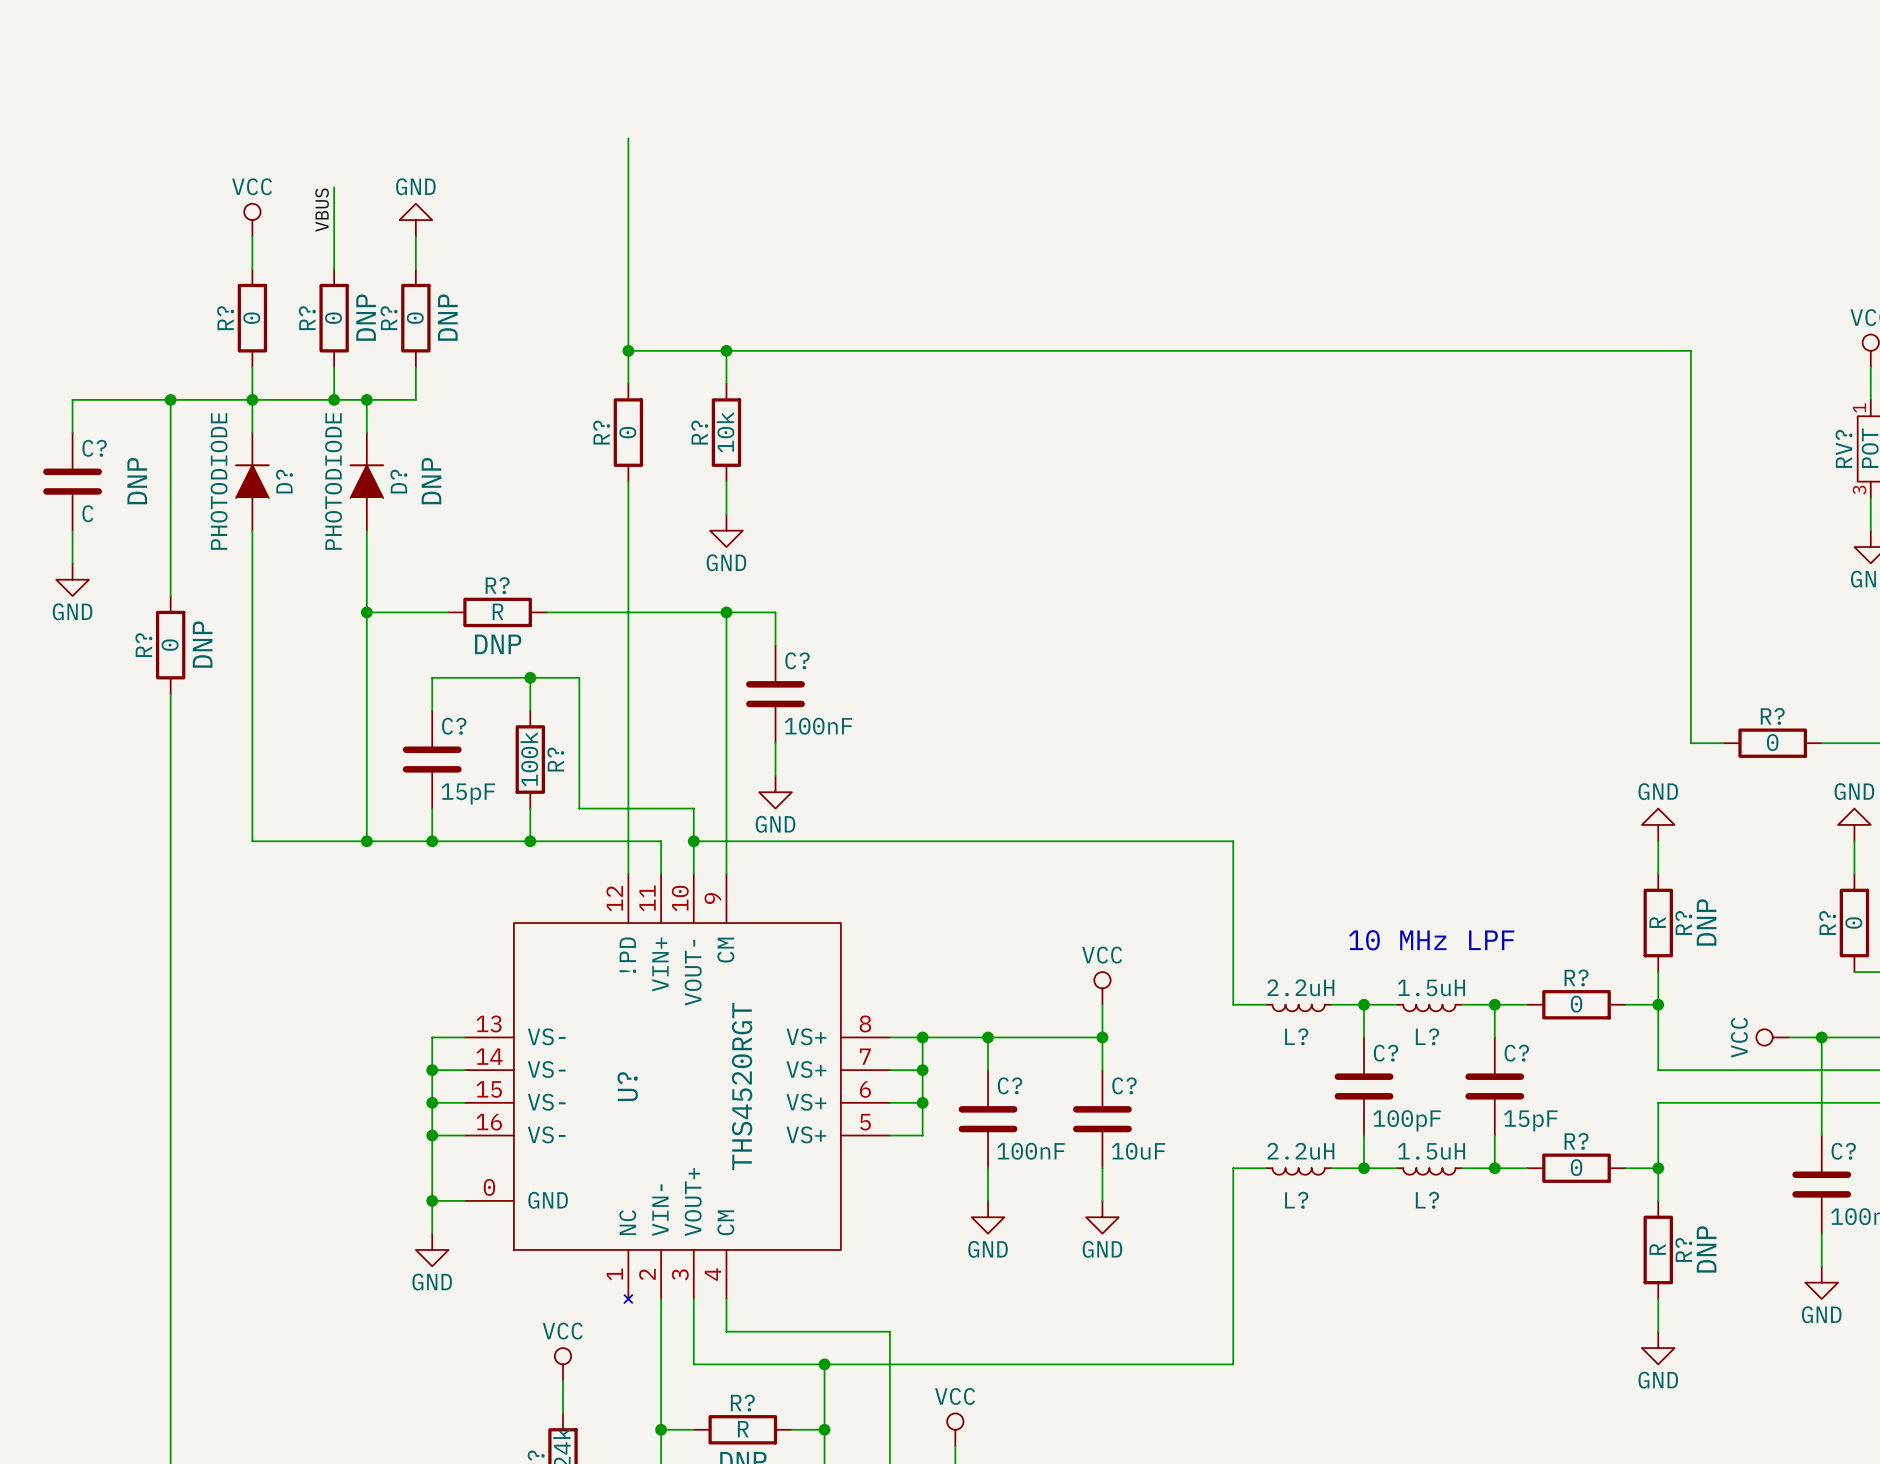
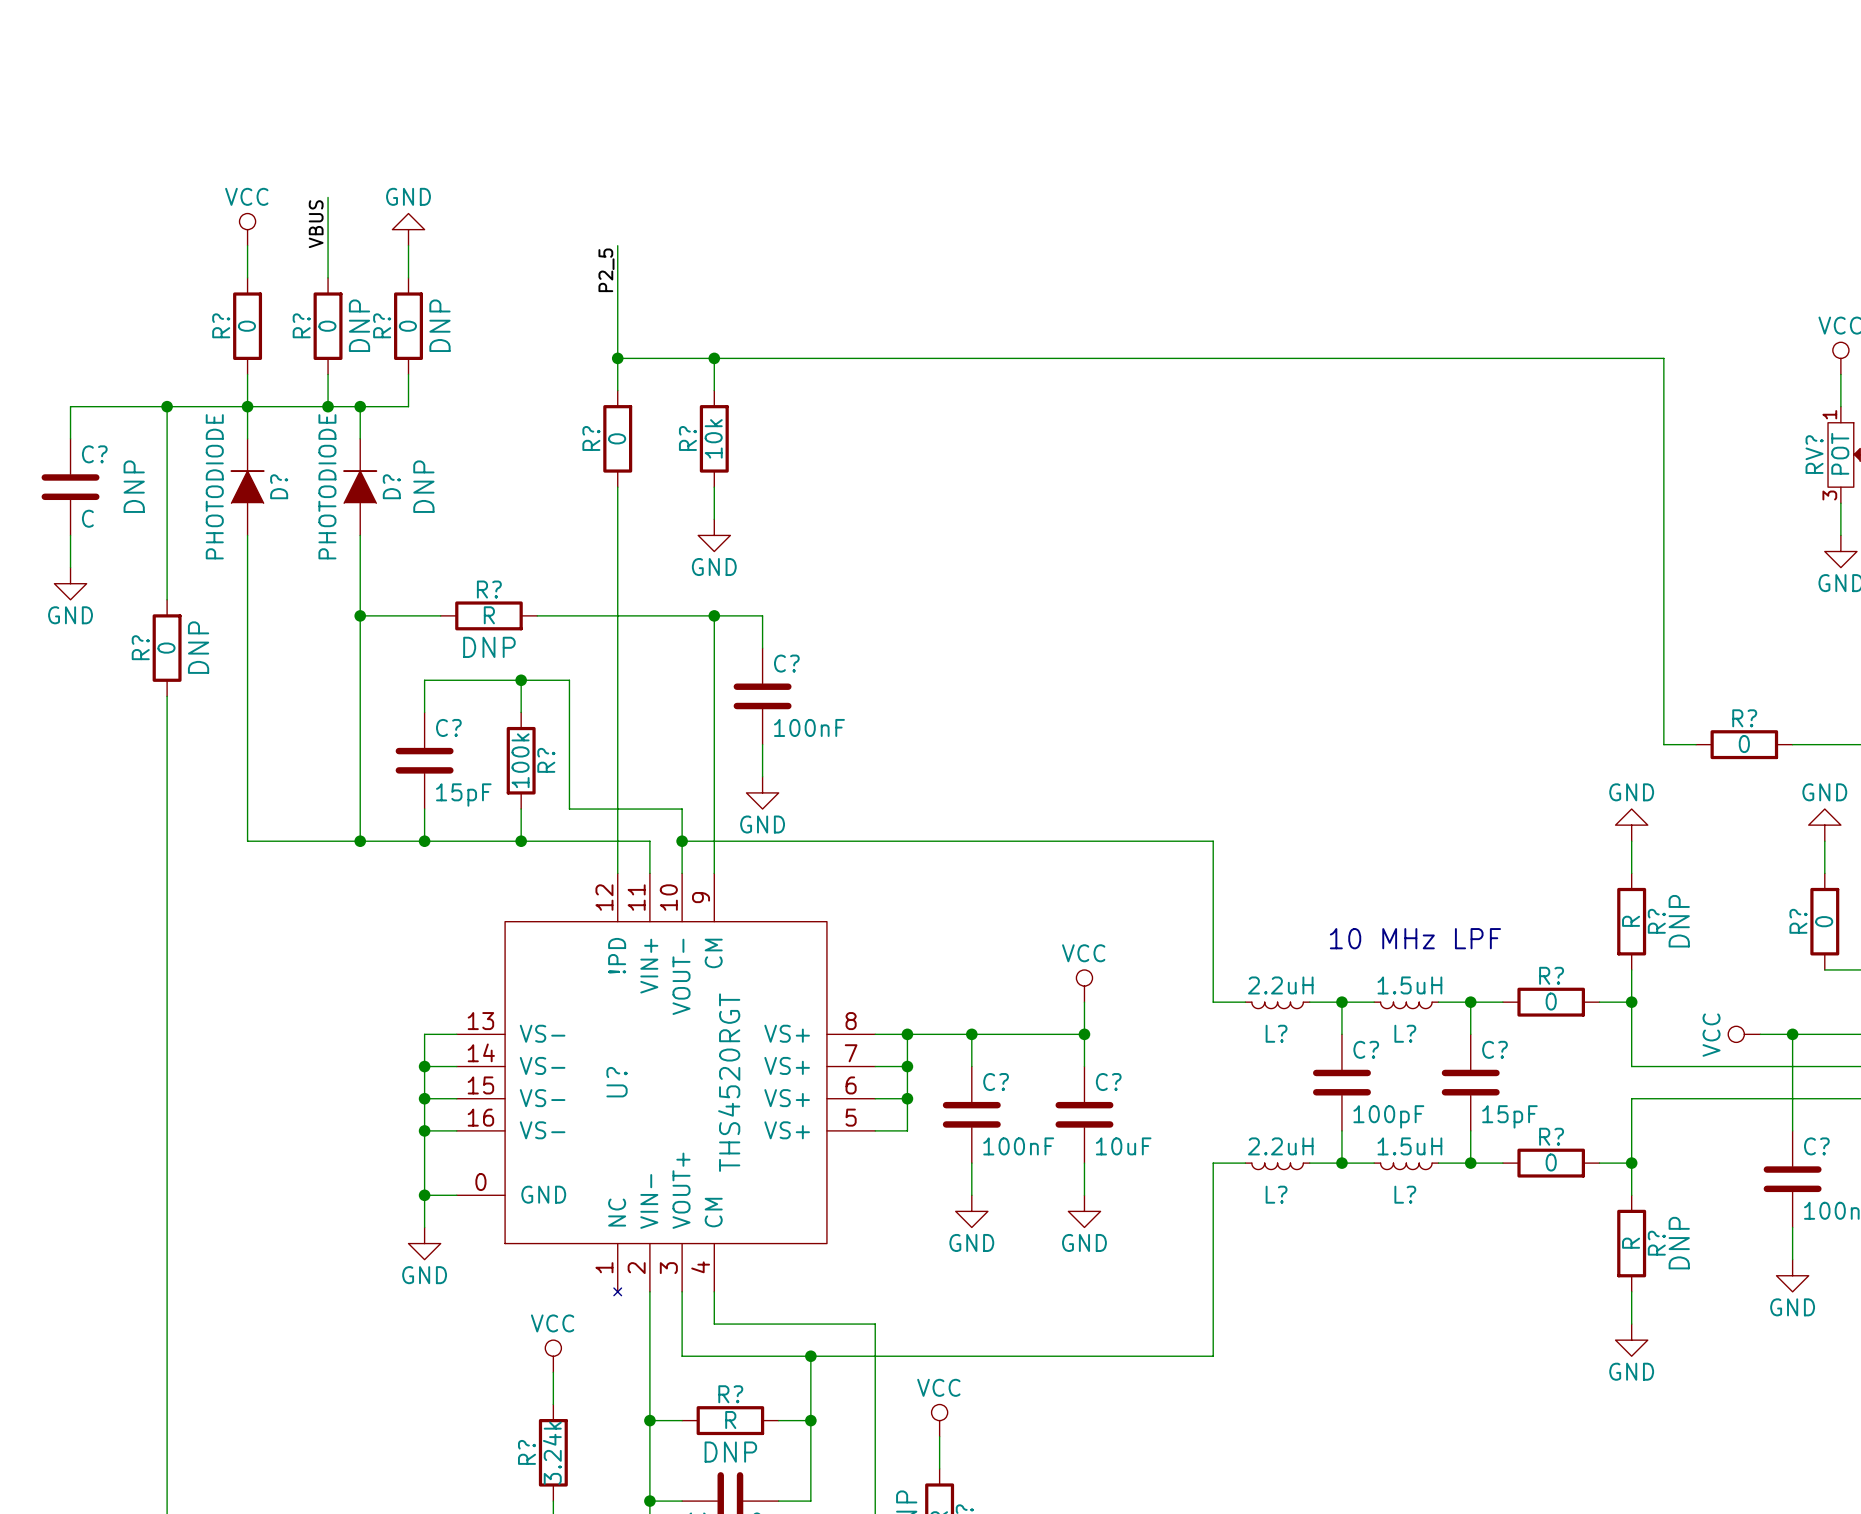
wire: (628, 138) (628, 236) -> none
label: none -> P2_5 (606, 270)

